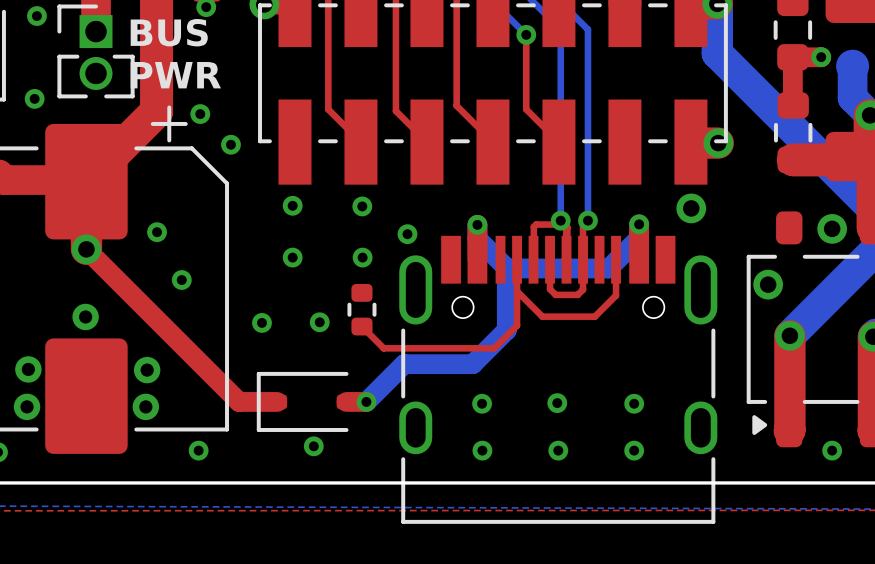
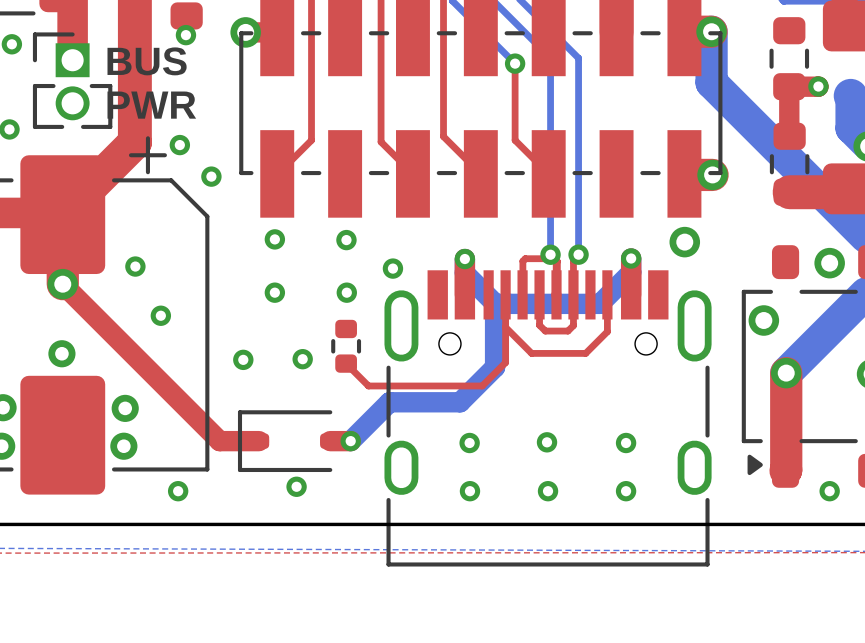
top track: (328, 109) (360, 142) -> (311, 140) (277, 173)

